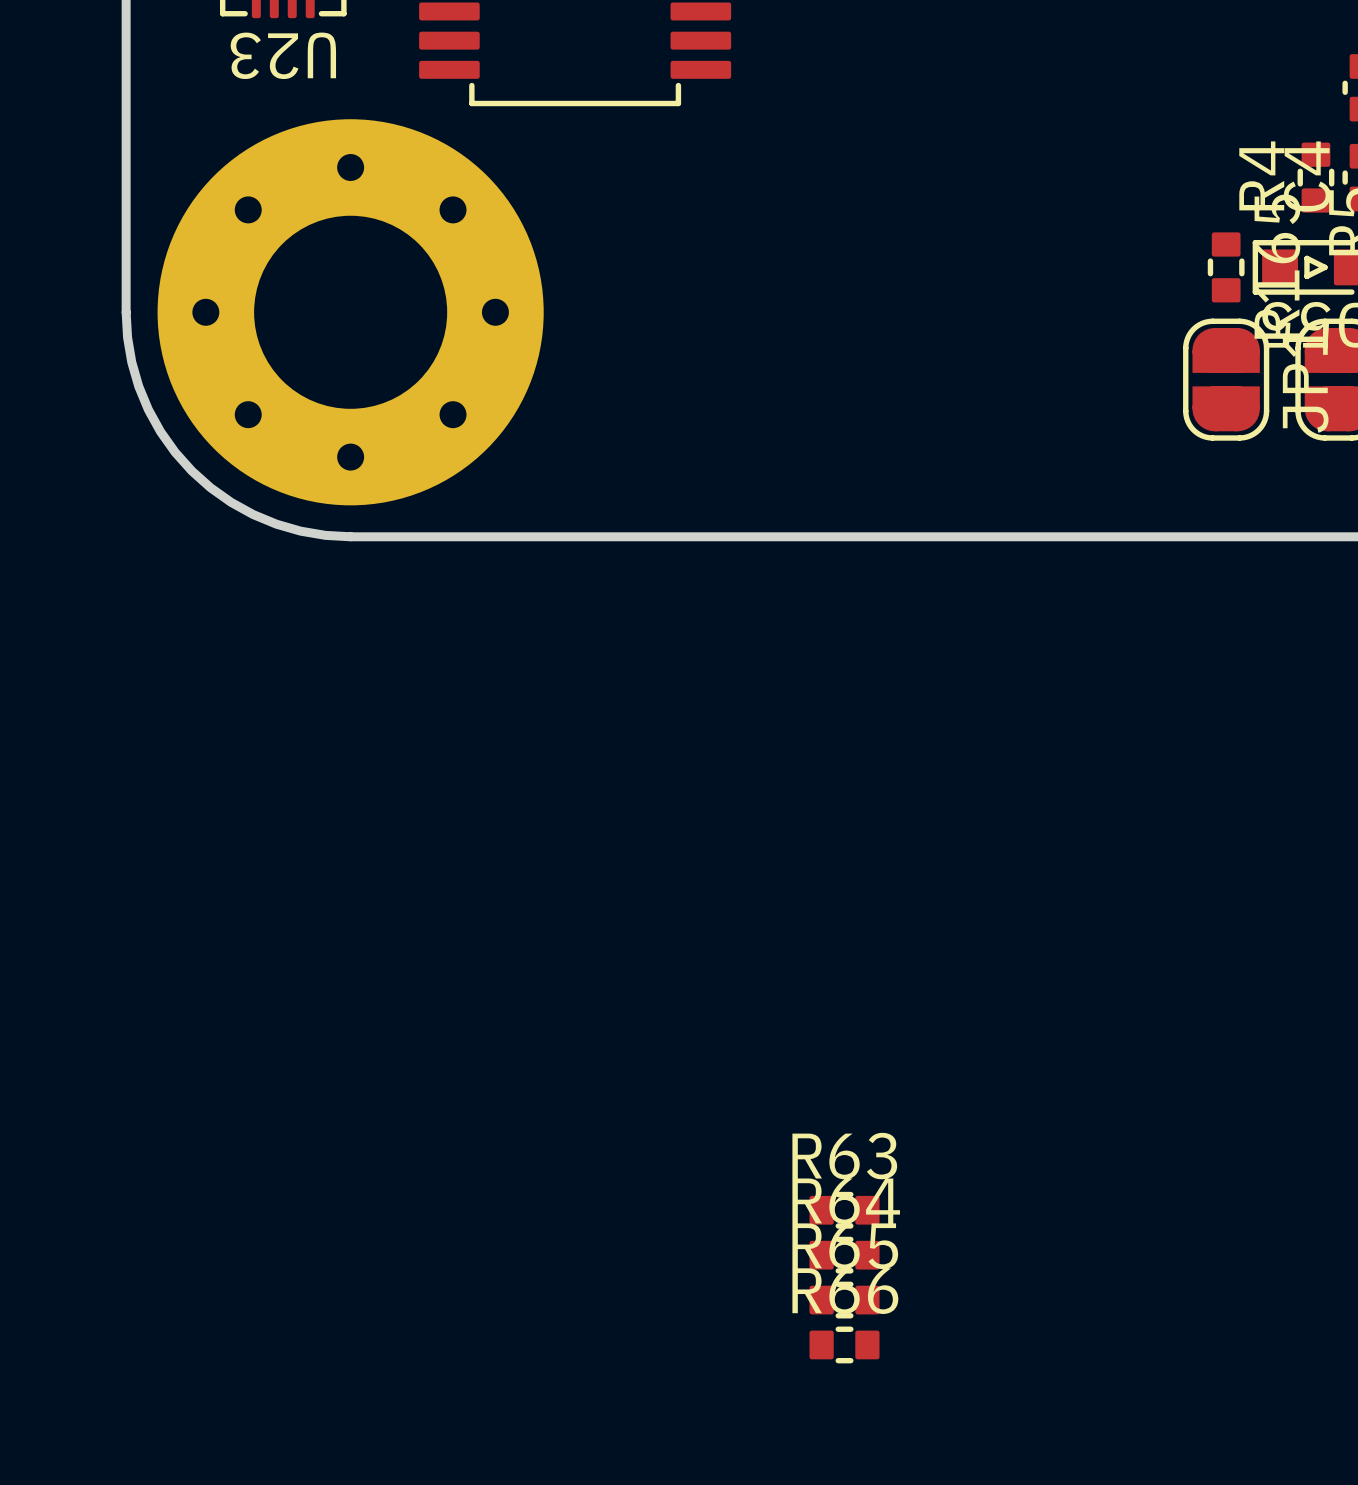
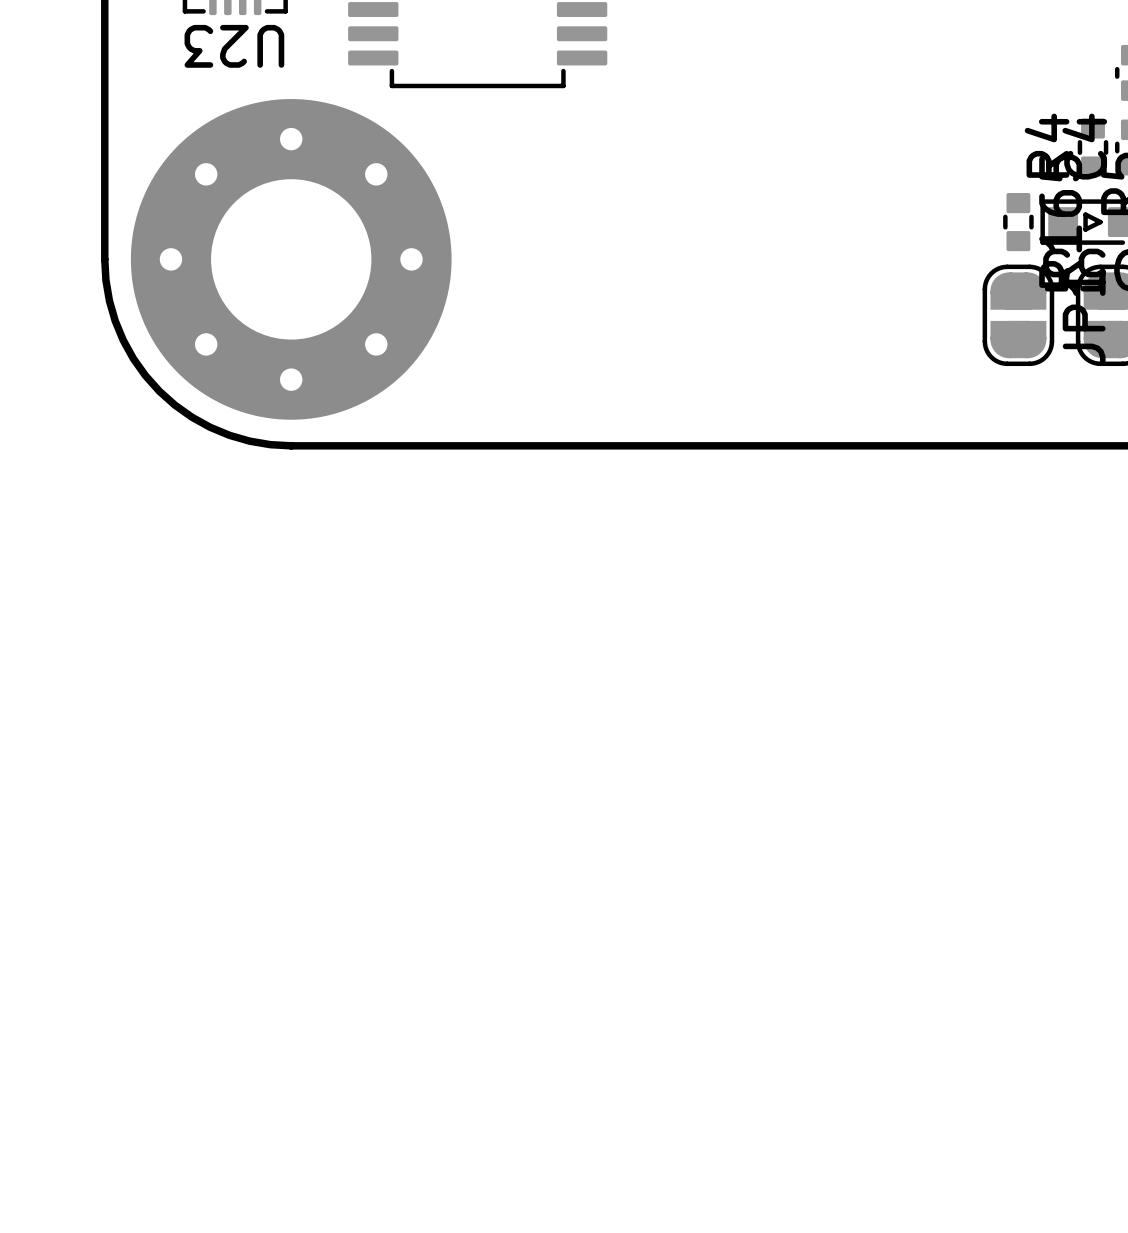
R63: (844, 1210) -> none
R64: (844, 1255) -> none
R65: (844, 1300) -> none
R66: (844, 1344) -> none

